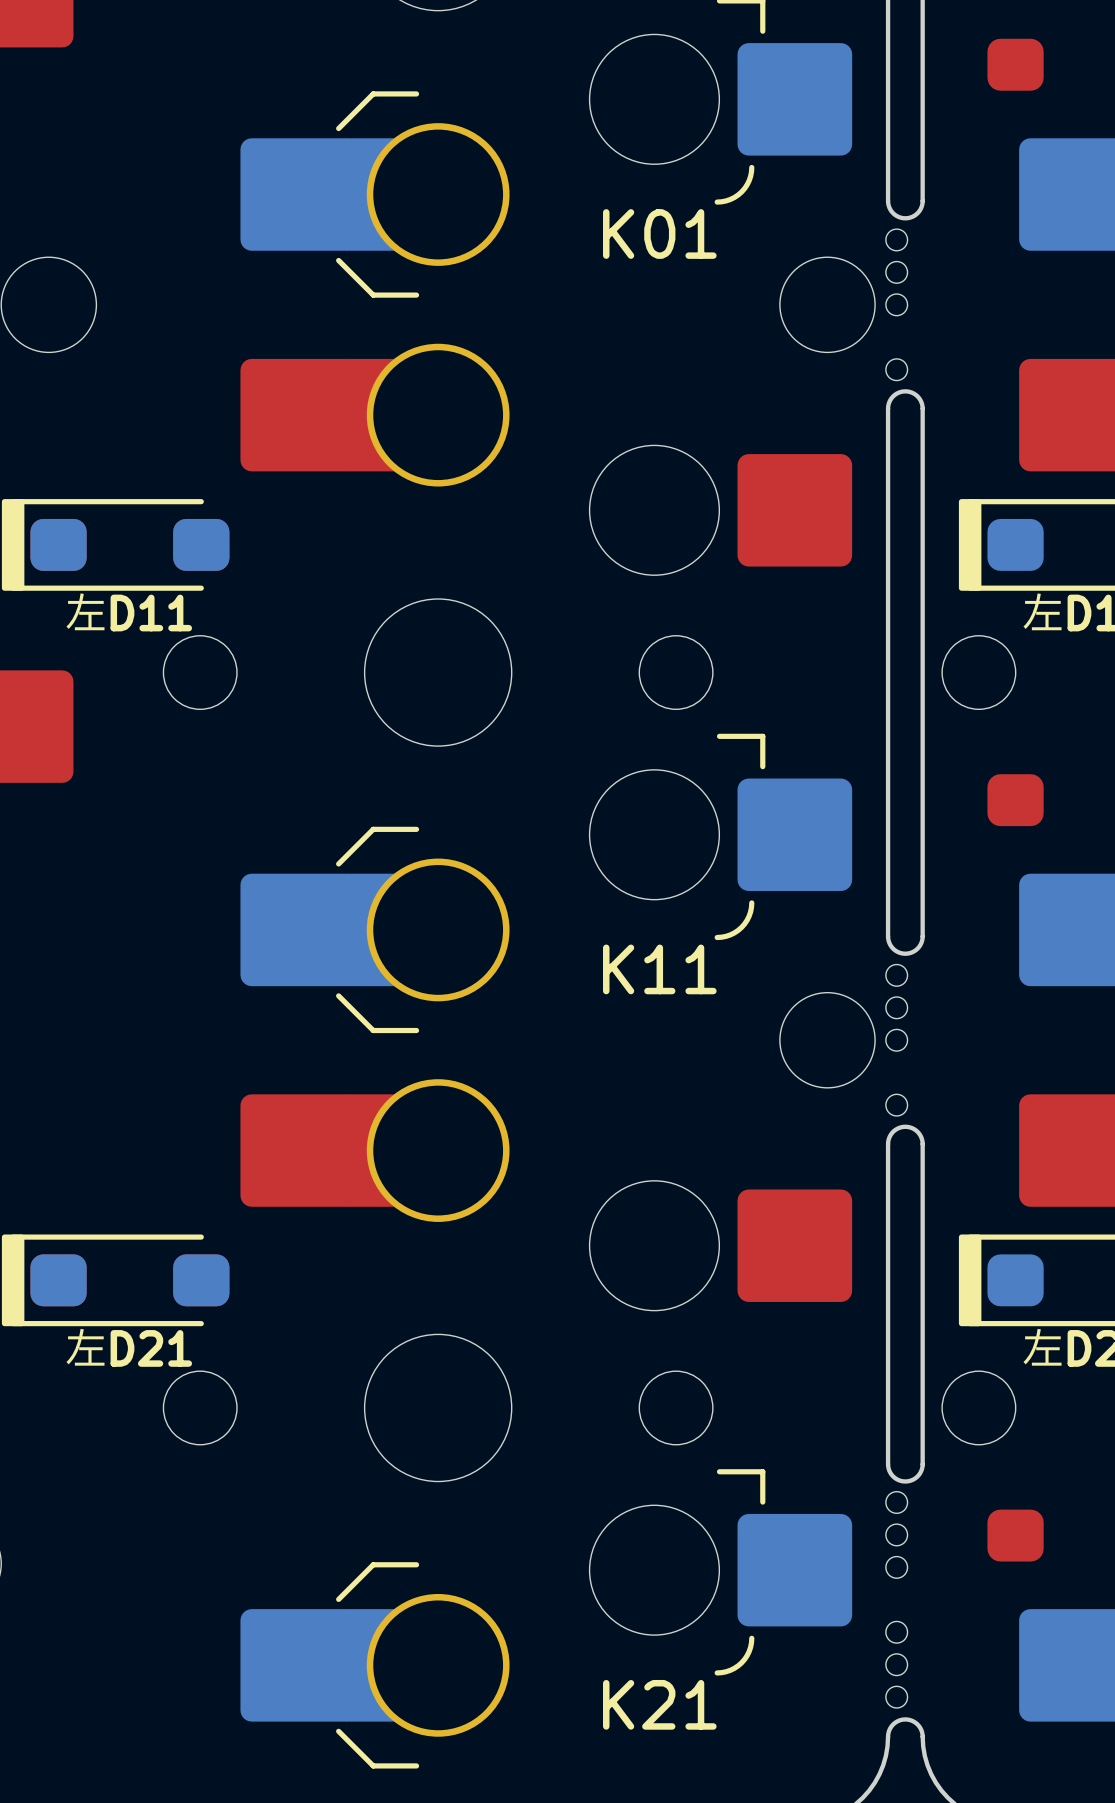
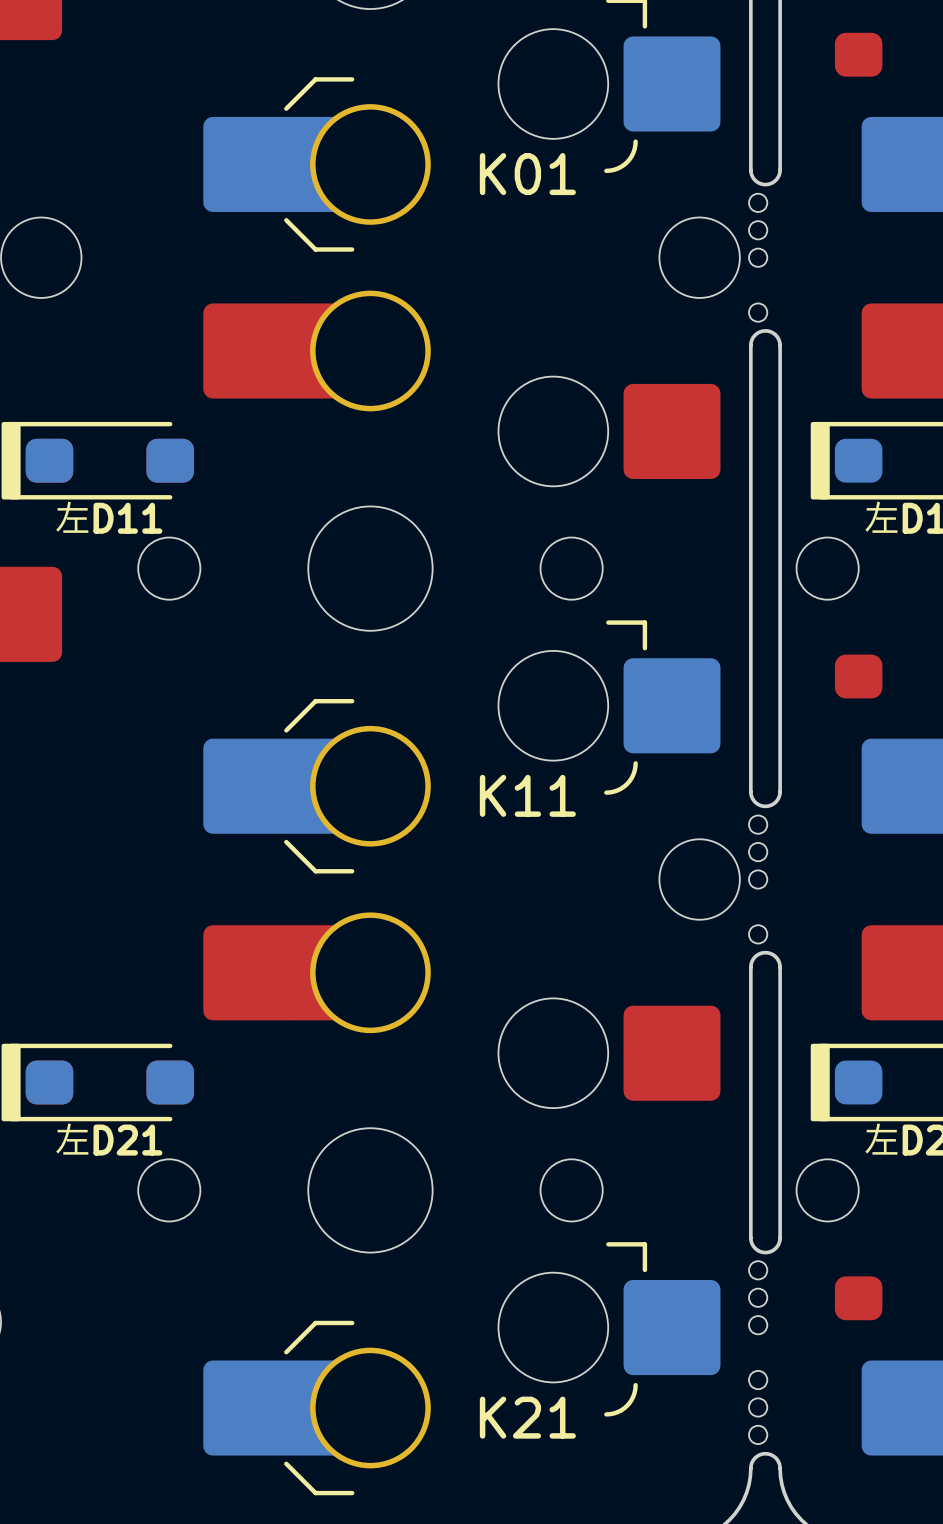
K01 name position: K01 (659, 233) -> K01 (527, 174)
K11 name position: K11 (659, 969) -> K11 (527, 795)
K21 name position: K21 (659, 1704) -> K21 (527, 1417)

